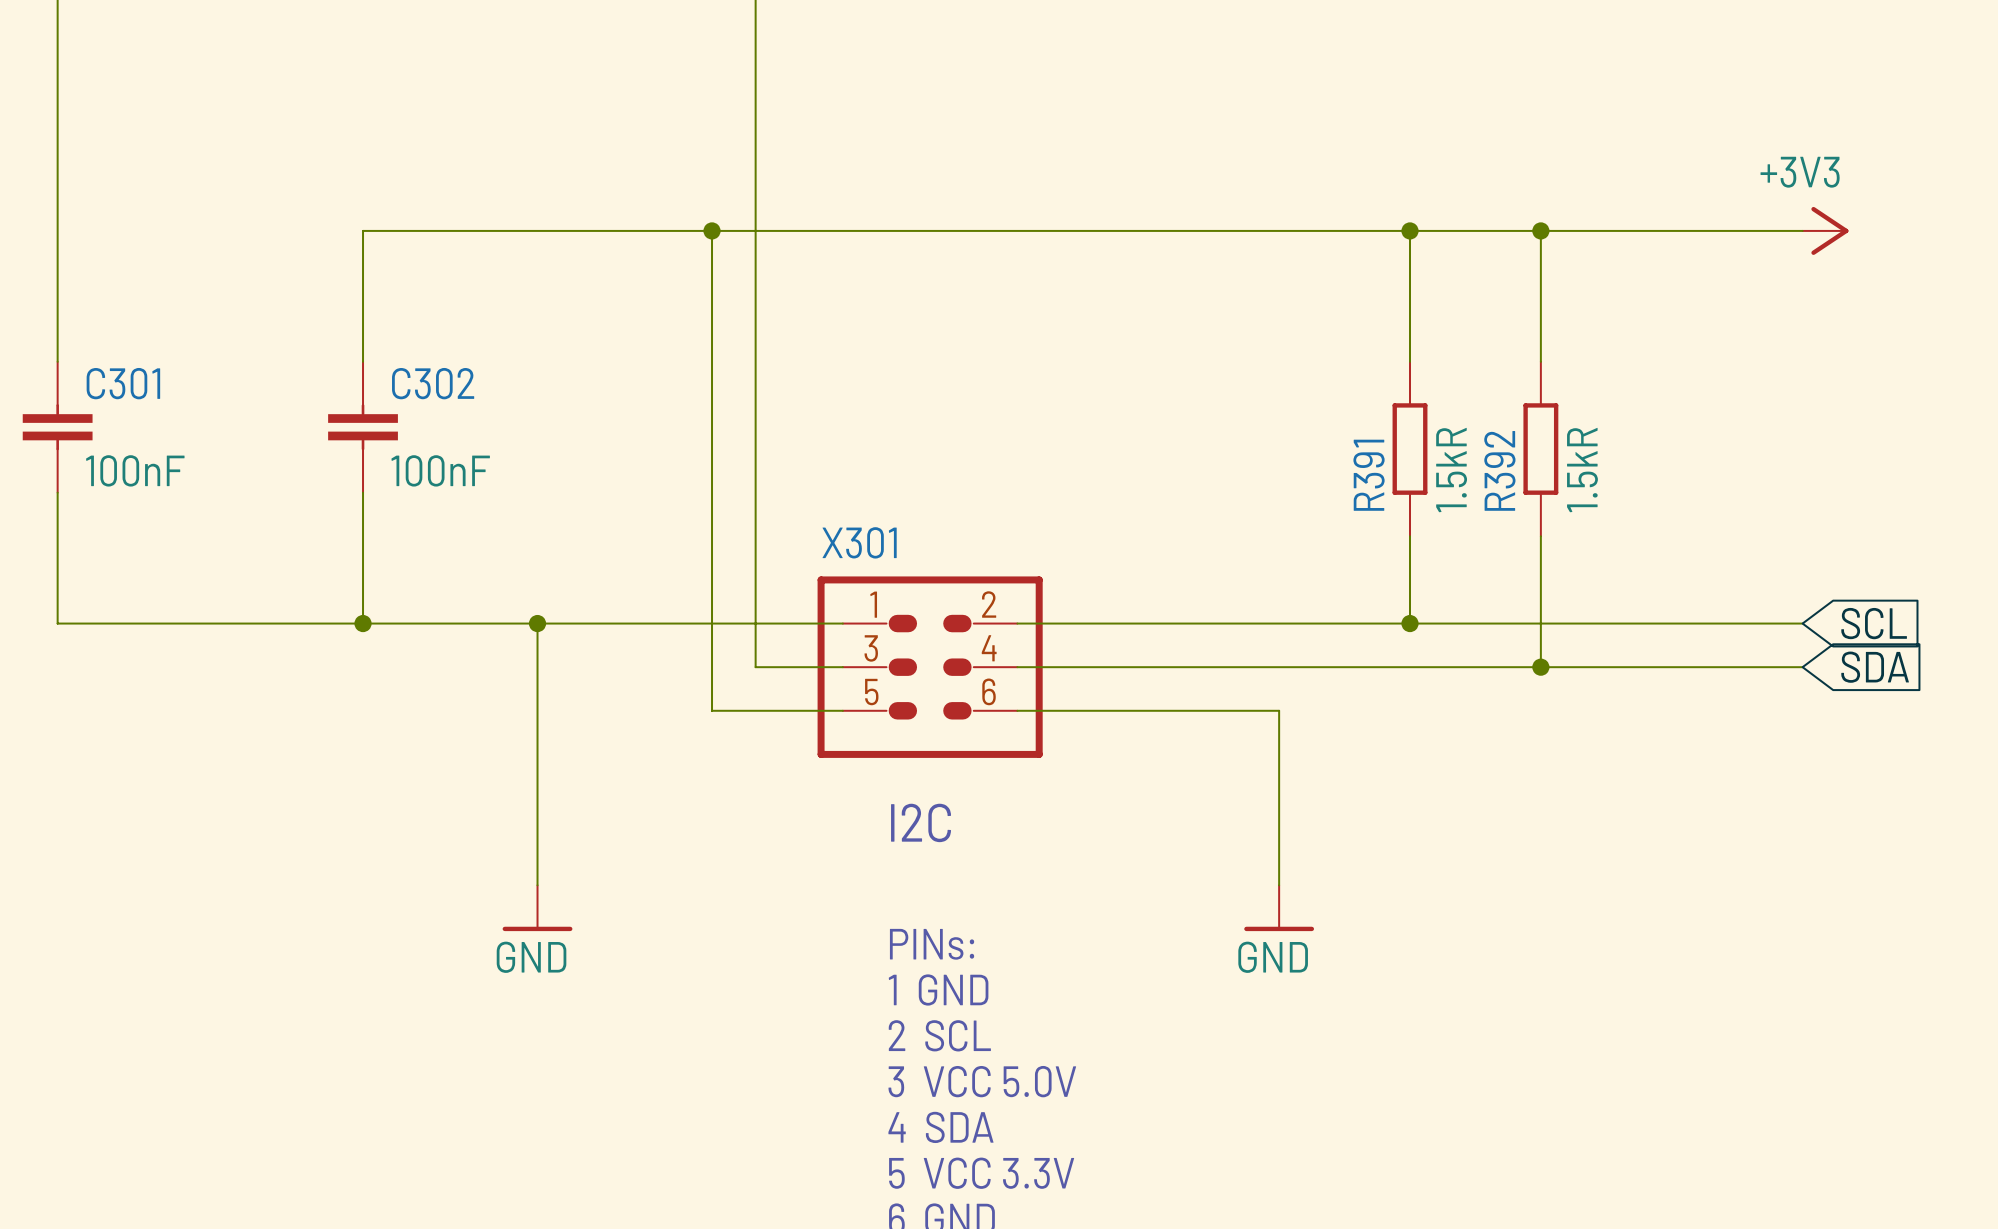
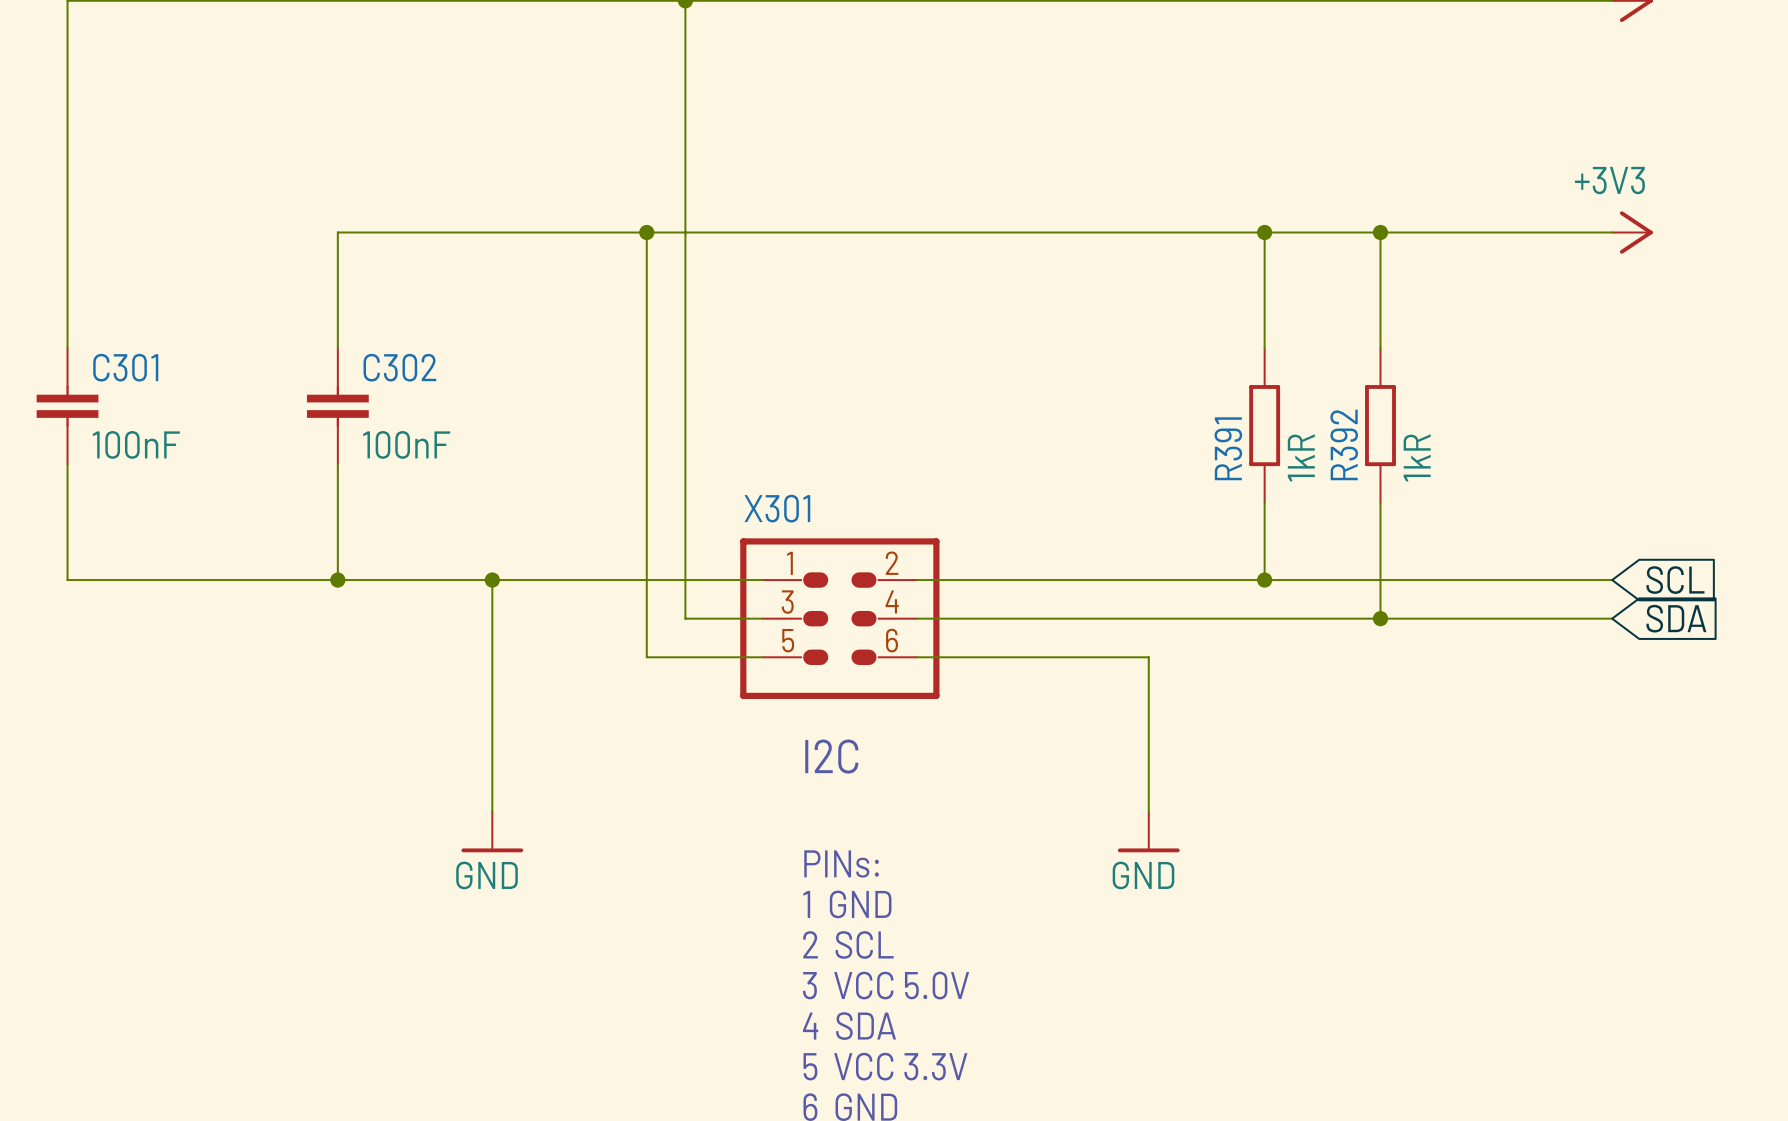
R391 value: 1.5kR (1451, 470) -> 1kR (1301, 457)
R392 value: 1.5kR (1582, 470) -> 1kR (1417, 457)

